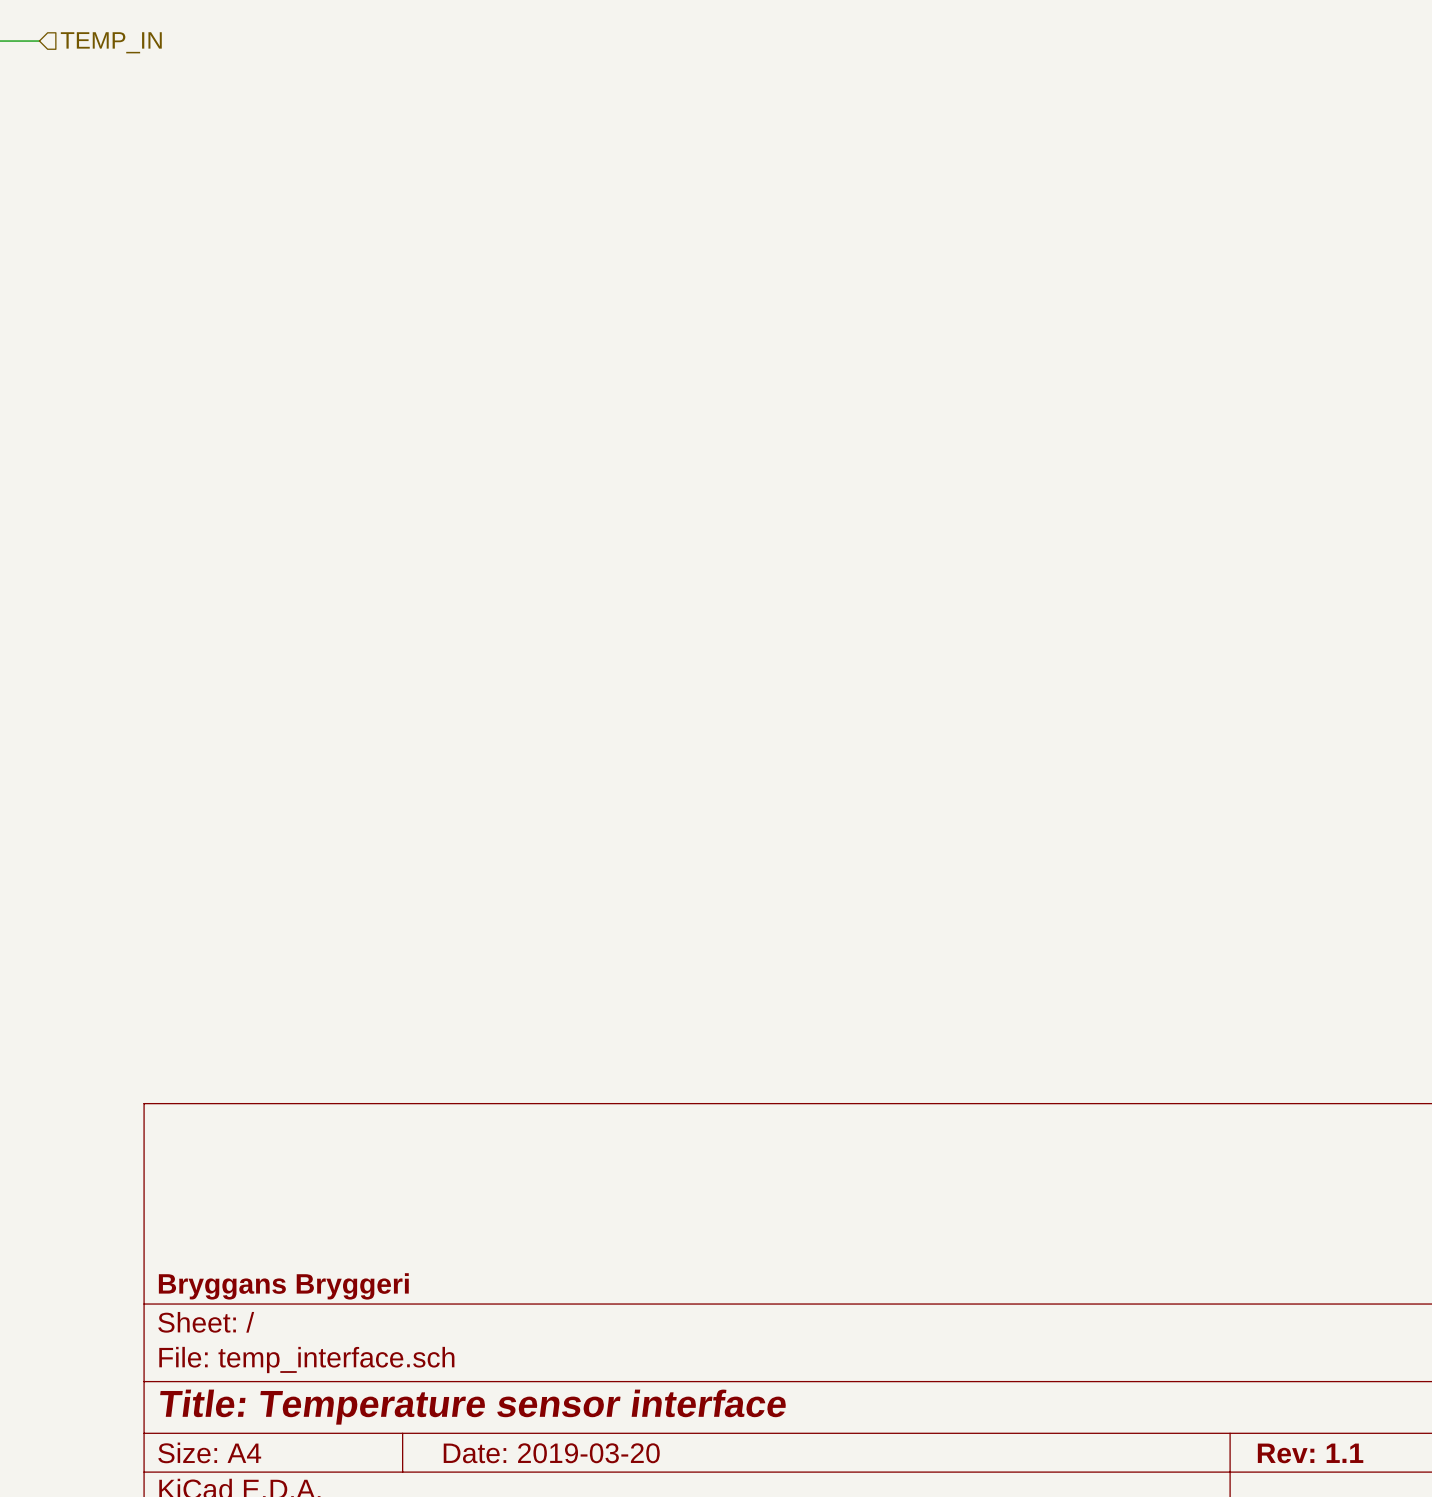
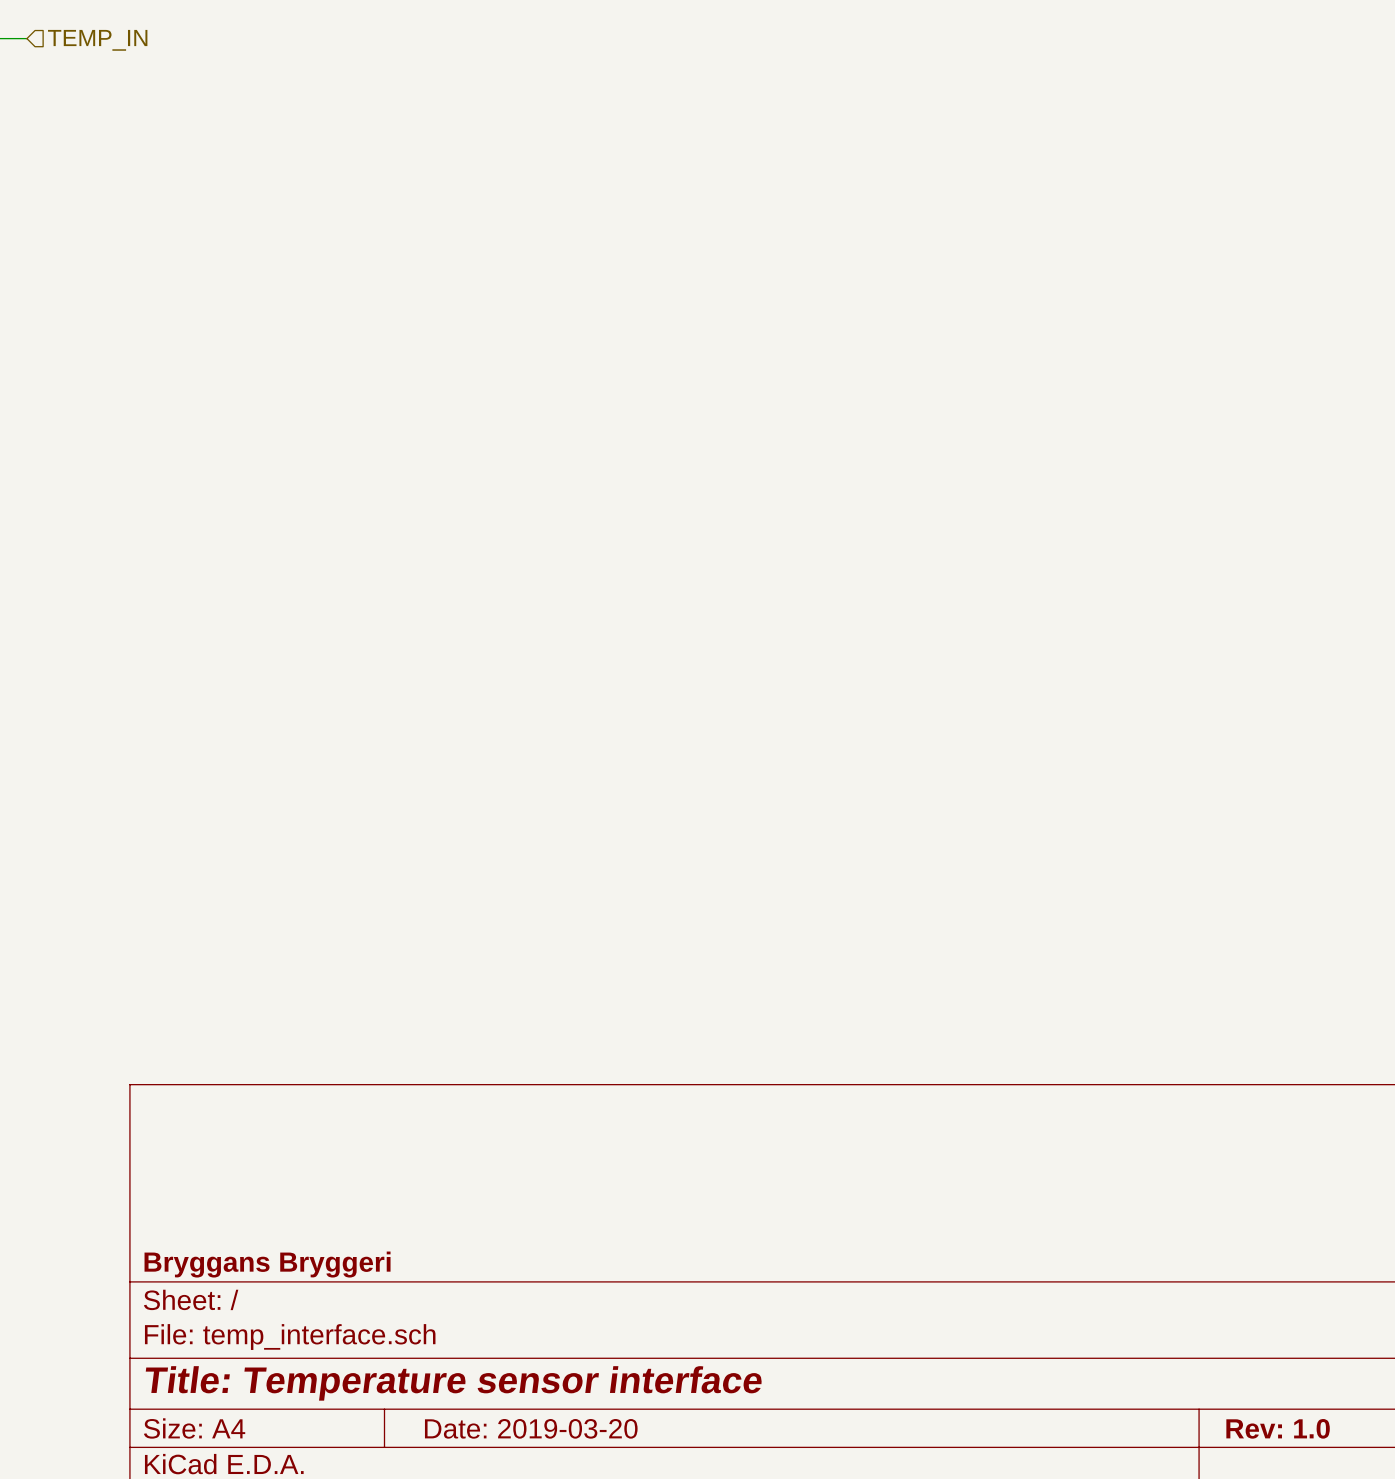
title block: Rev: 1.1 (1310, 1453) -> Rev: 1.0 (1278, 1428)

